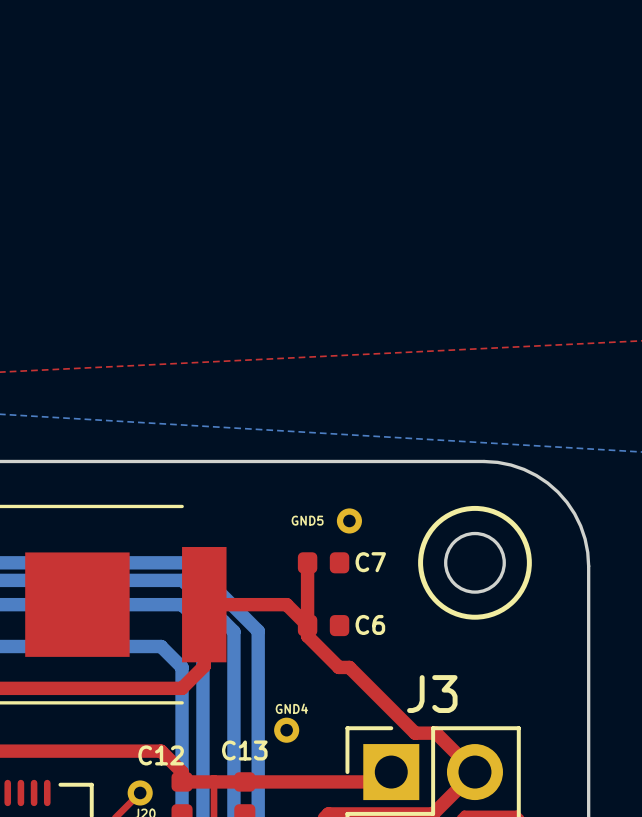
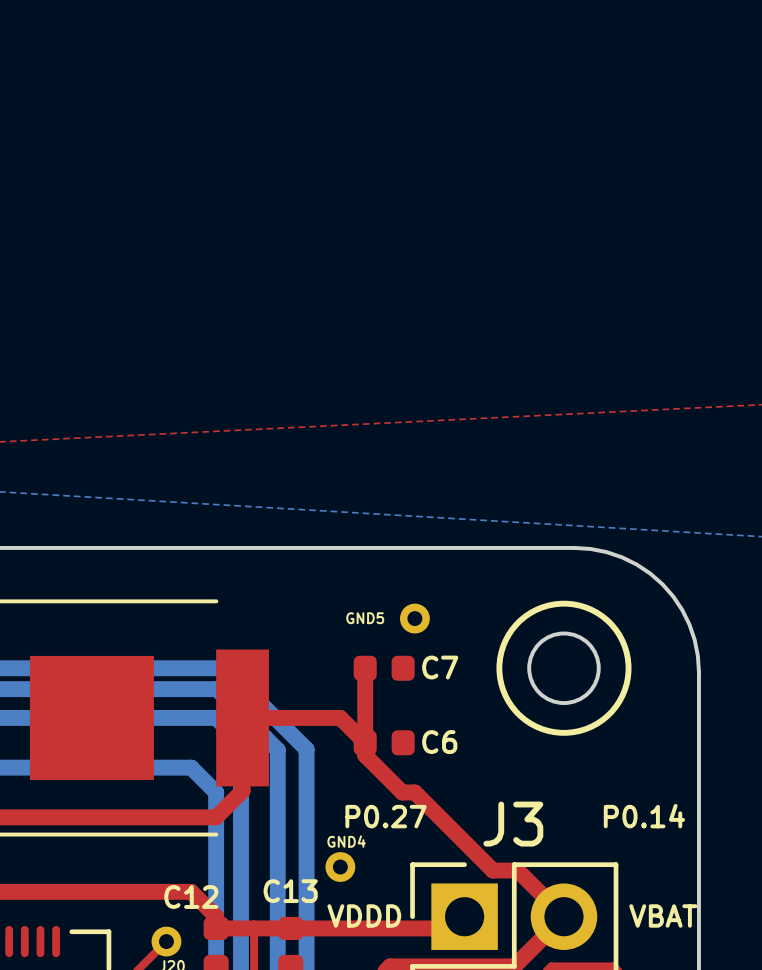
text: none -> P0.27 (386, 816)
text: none -> P0.14 (644, 816)
text: none -> VDDD (364, 915)
text: none -> VBAT (663, 915)

